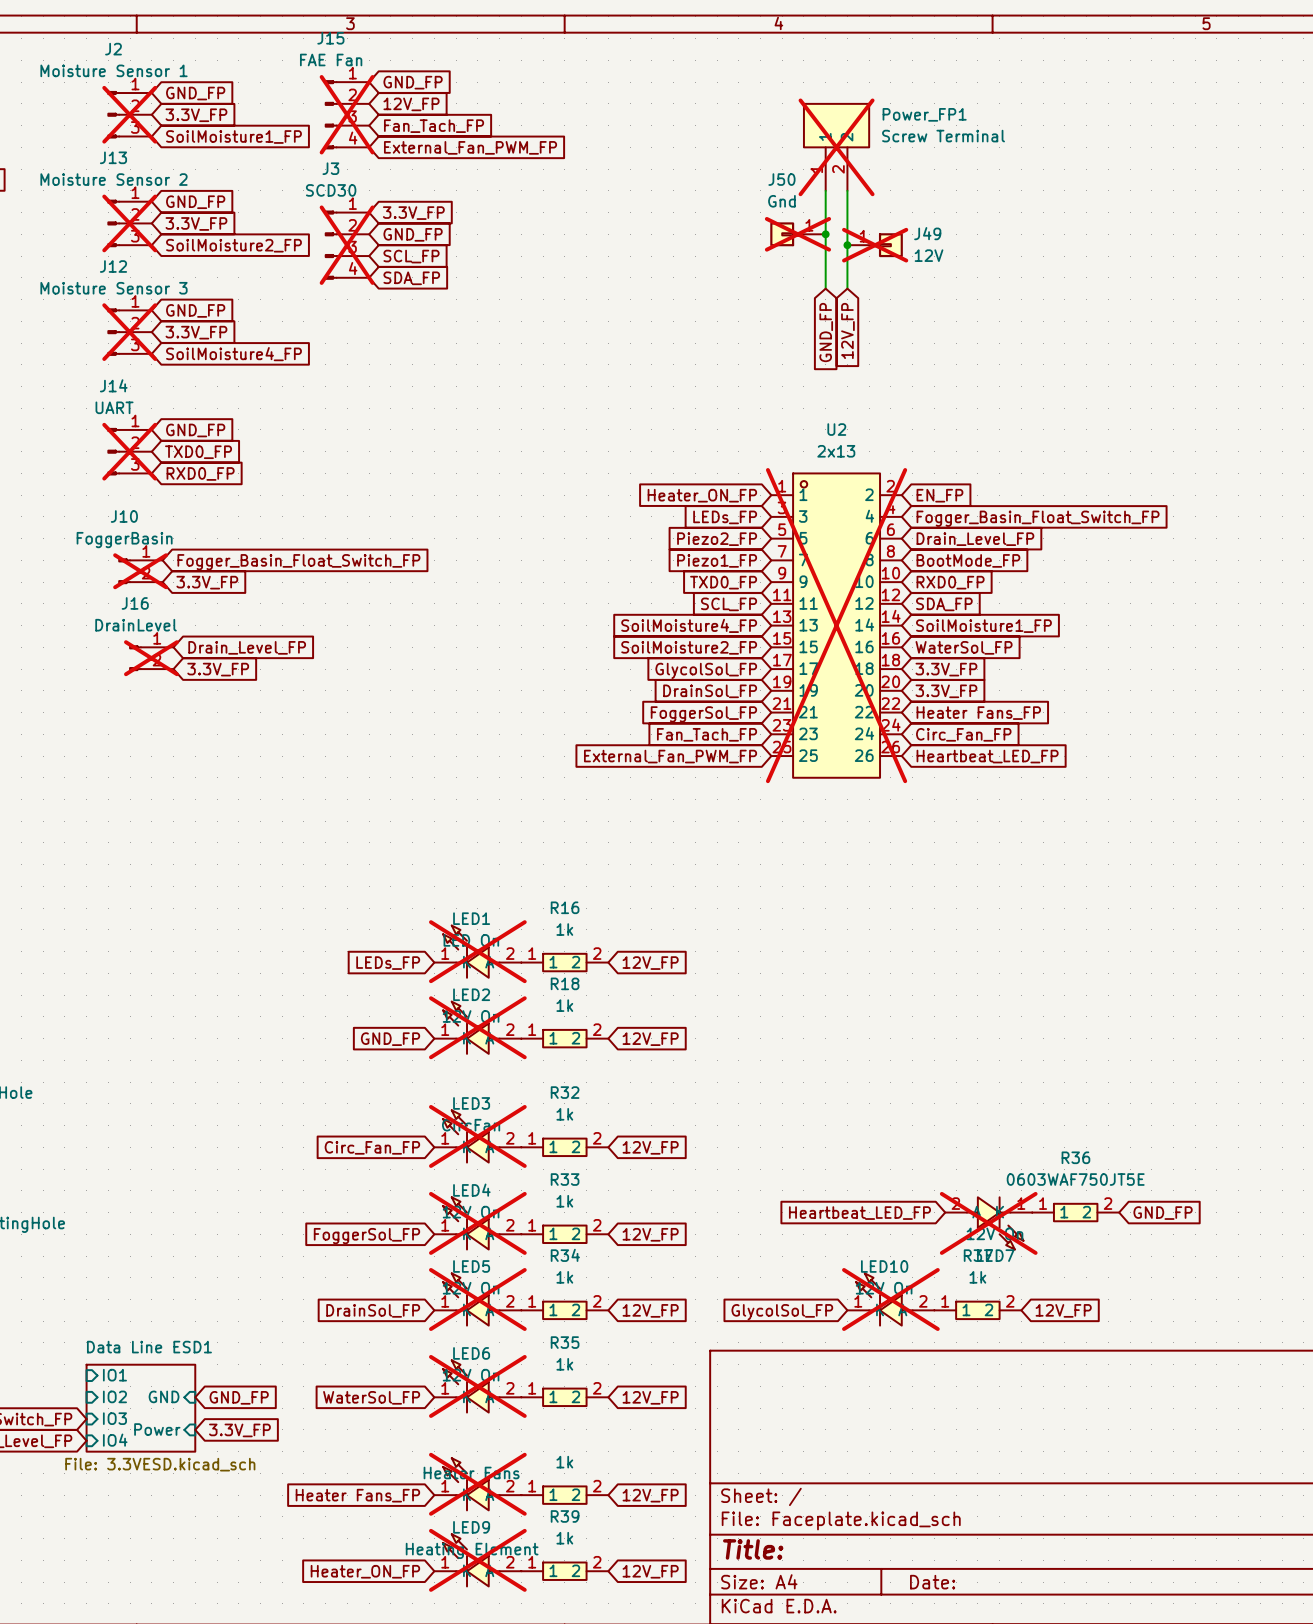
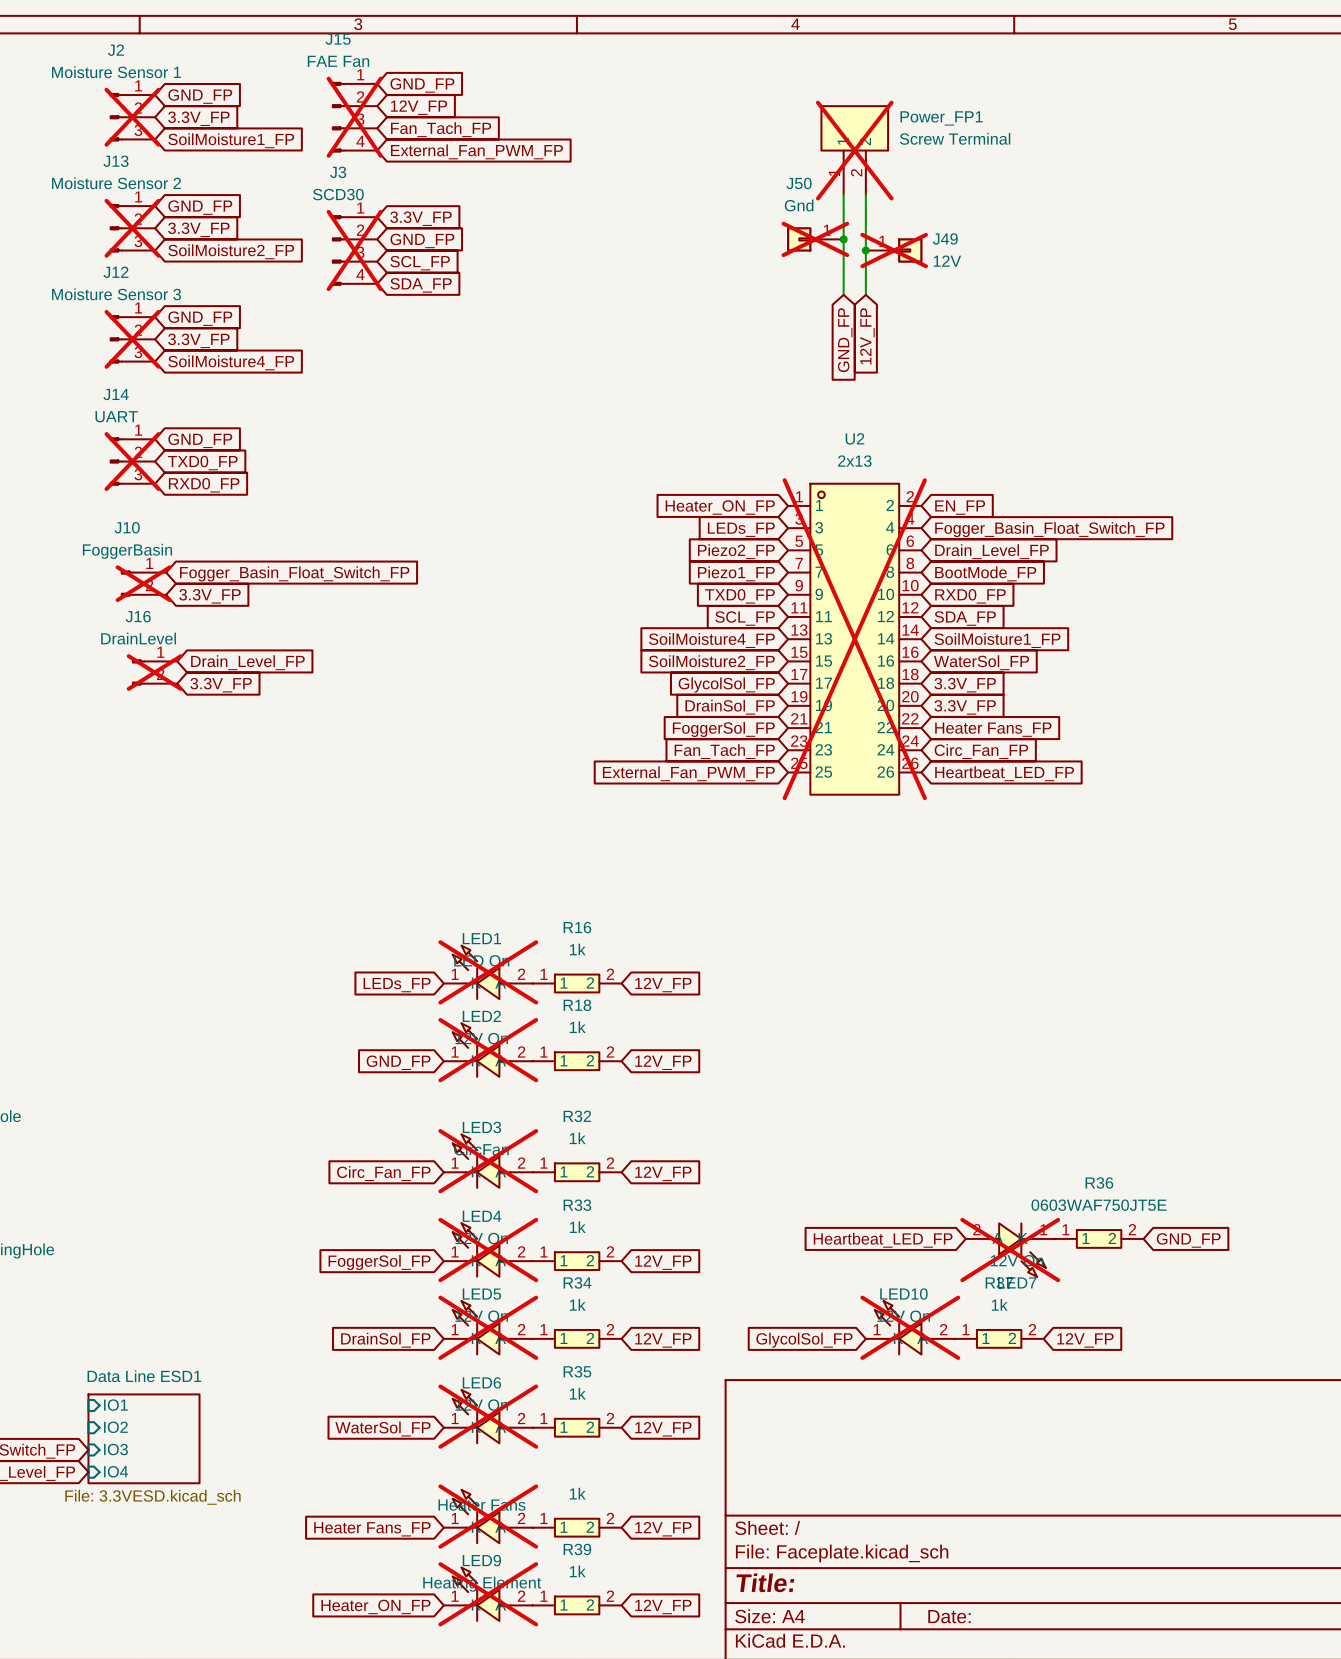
sheet pin: GND (164, 1396) -> none
global label: GND_FP (239, 1397) -> none
sheet pin: Power (157, 1429) -> none
global label: 3.3V_FP (239, 1430) -> none

